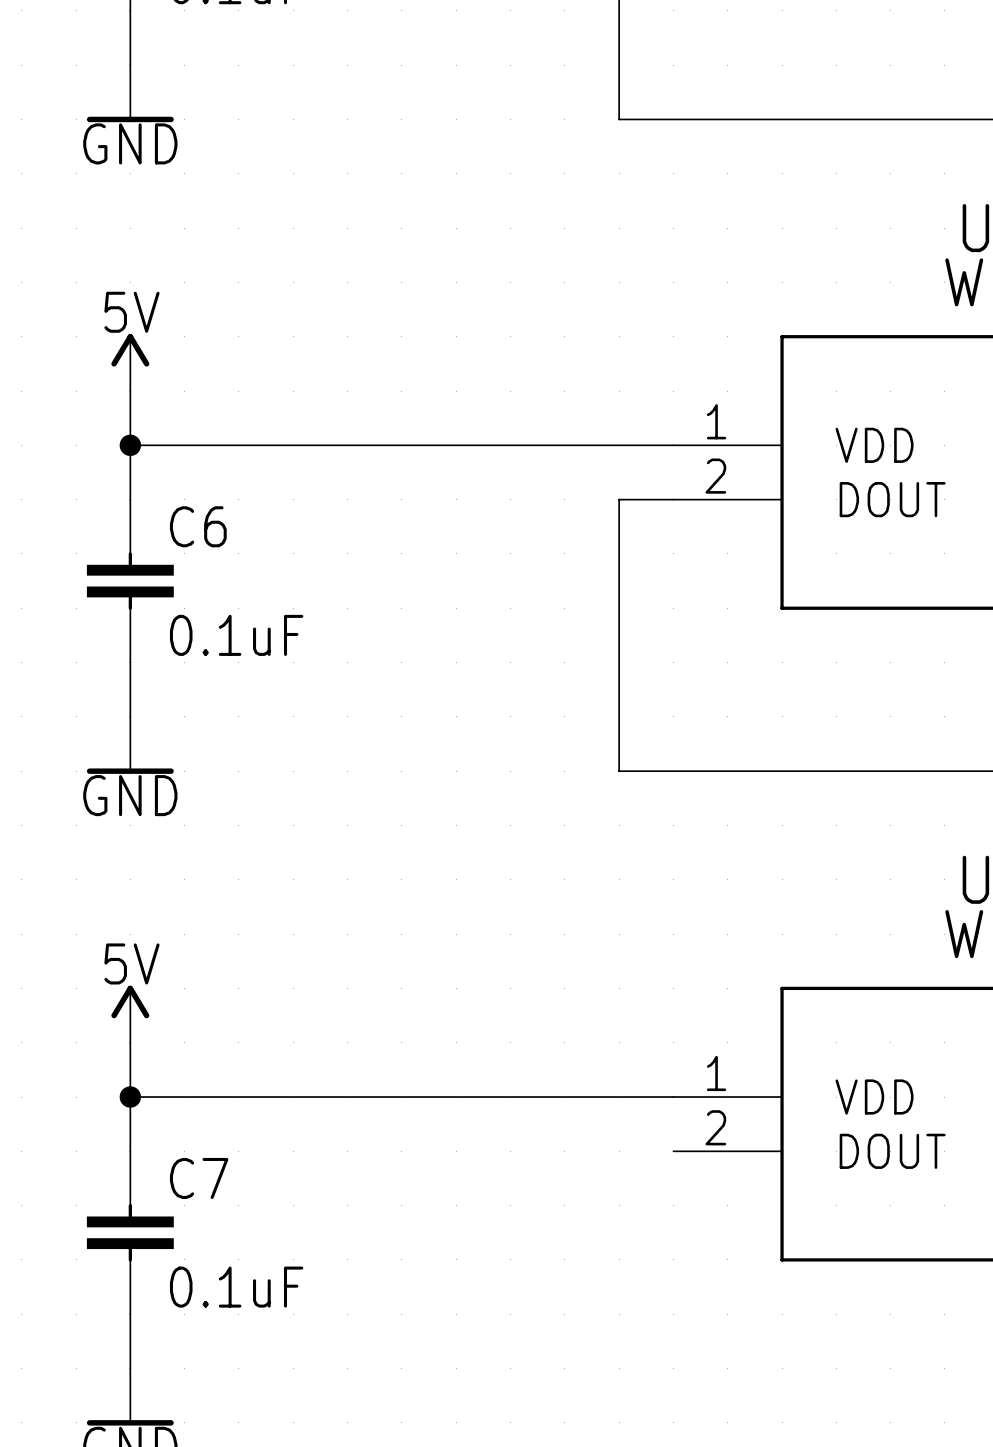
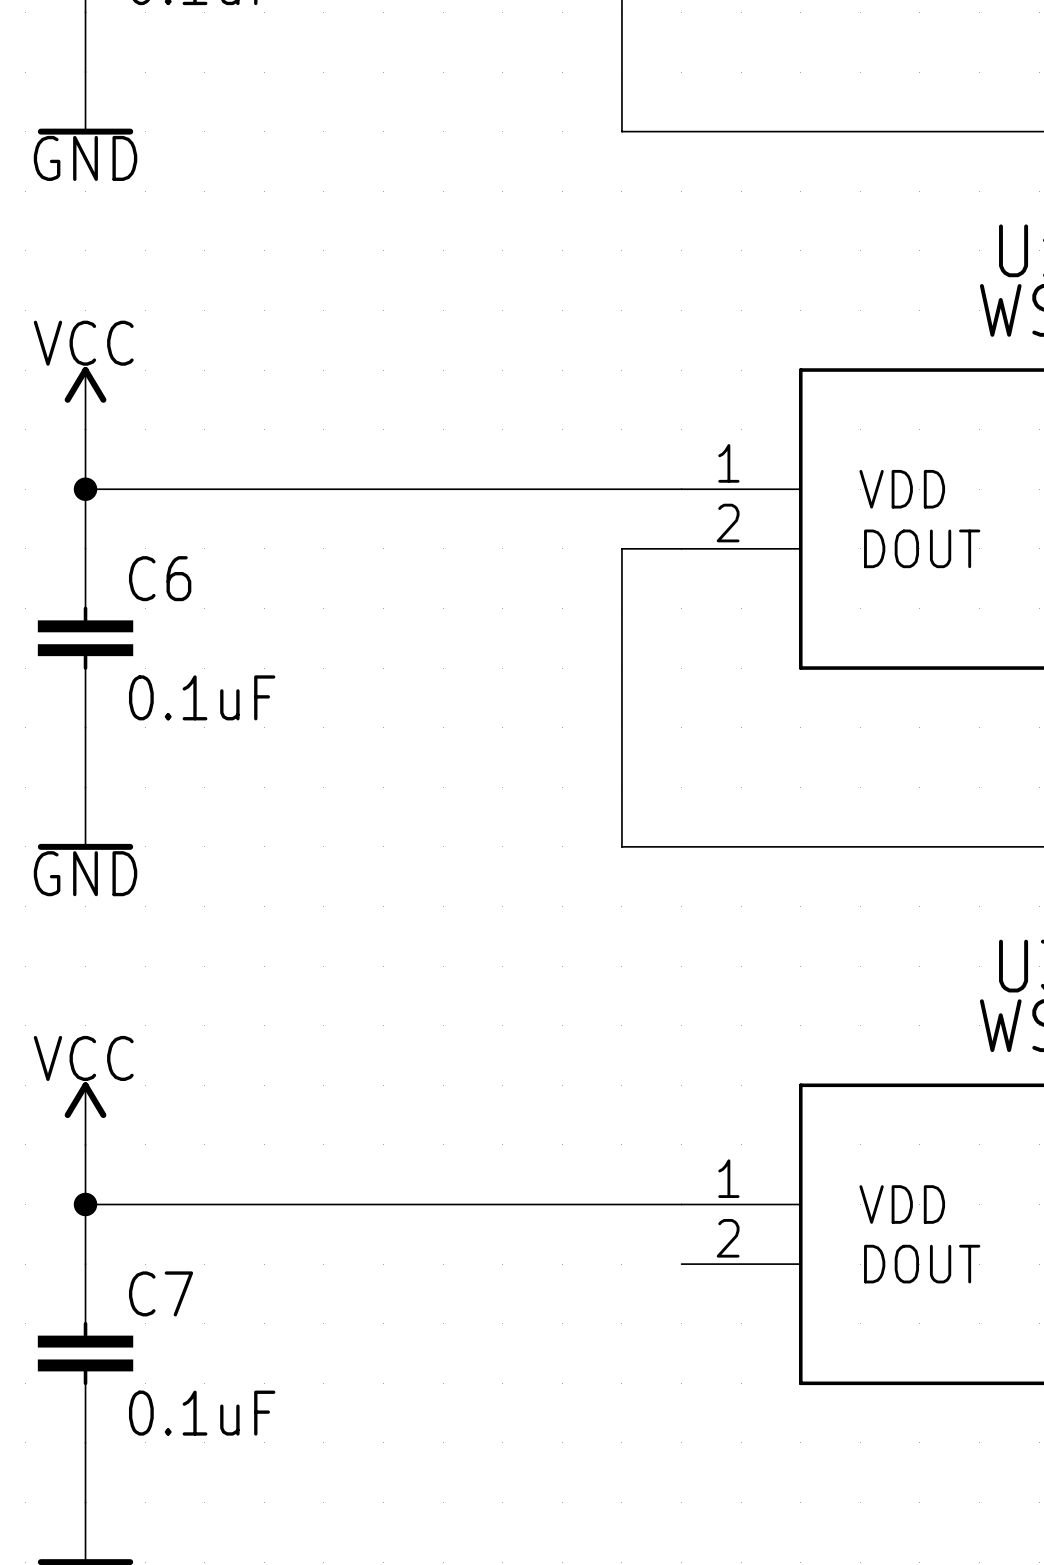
power symbol: 5V (130, 362) -> VCC (85, 398)
power symbol: 5V (130, 1014) -> VCC (85, 1113)

